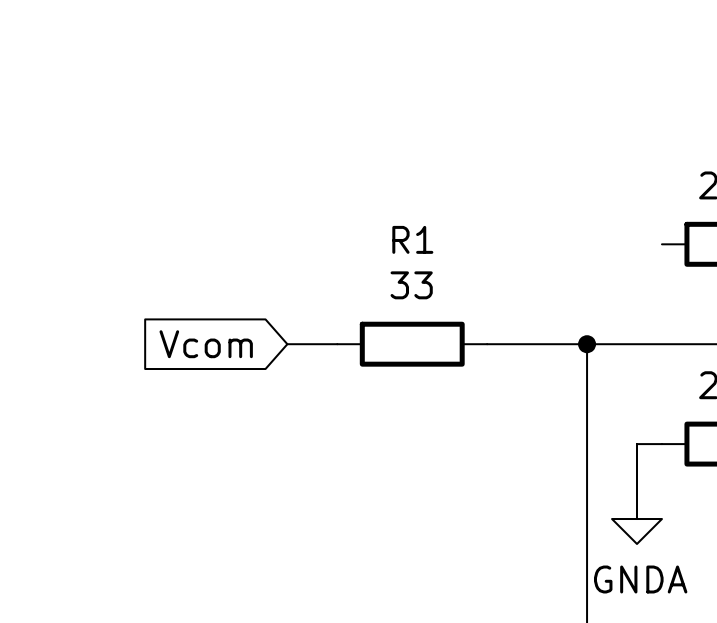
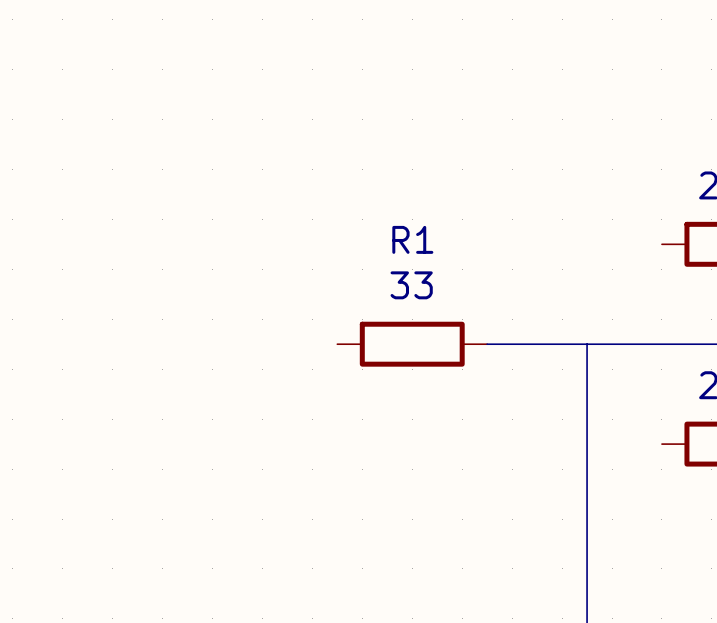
global label: Vcom (206, 344) -> none
wire: (287, 344) (337, 344) -> none
junction: (587, 344) -> none
wire: (661, 444) (637, 444) (637, 494) -> none
power symbol: GNDA (637, 519) -> none

